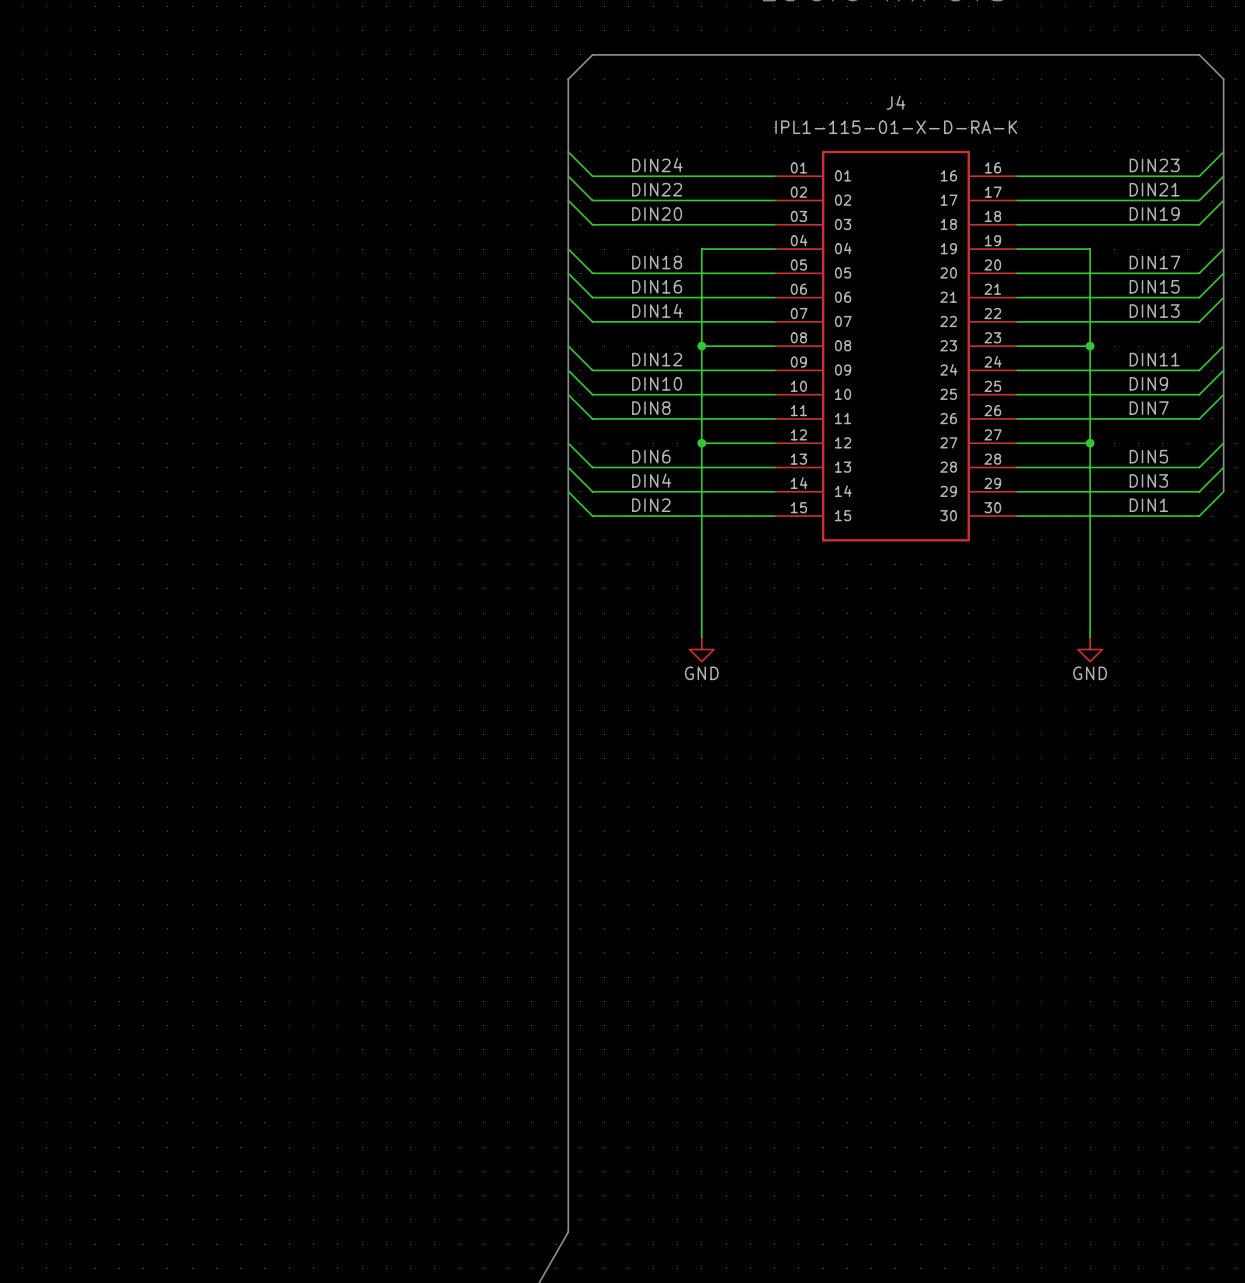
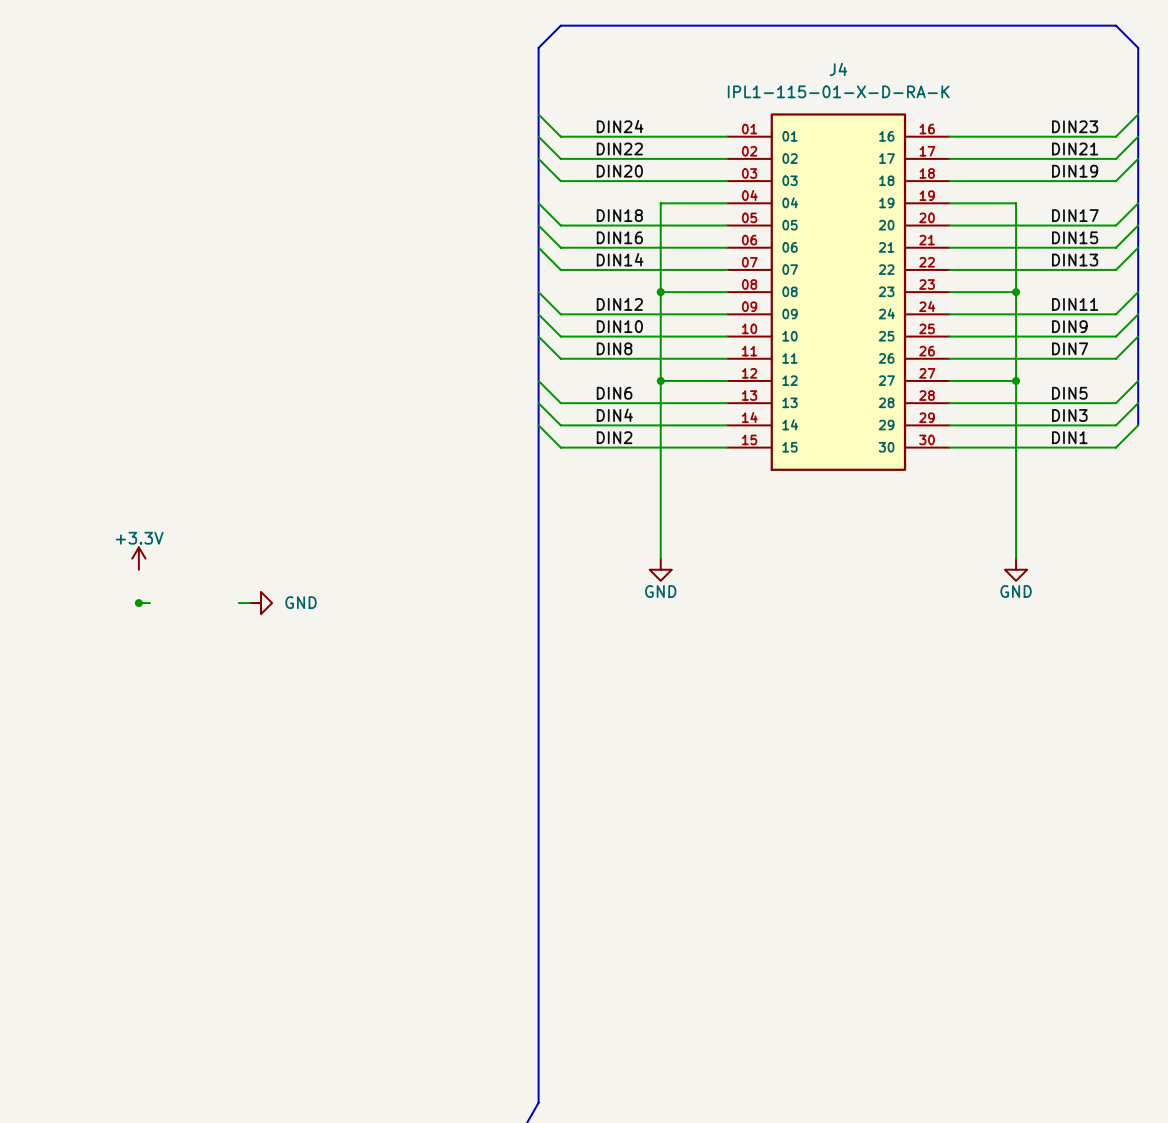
power symbol: none -> +3.3V (138, 558)
wire: none -> (138, 603) (149, 603)
junction: none -> (138, 603)
wire: none -> (238, 603) (249, 603)
power symbol: none -> GND (261, 603)

